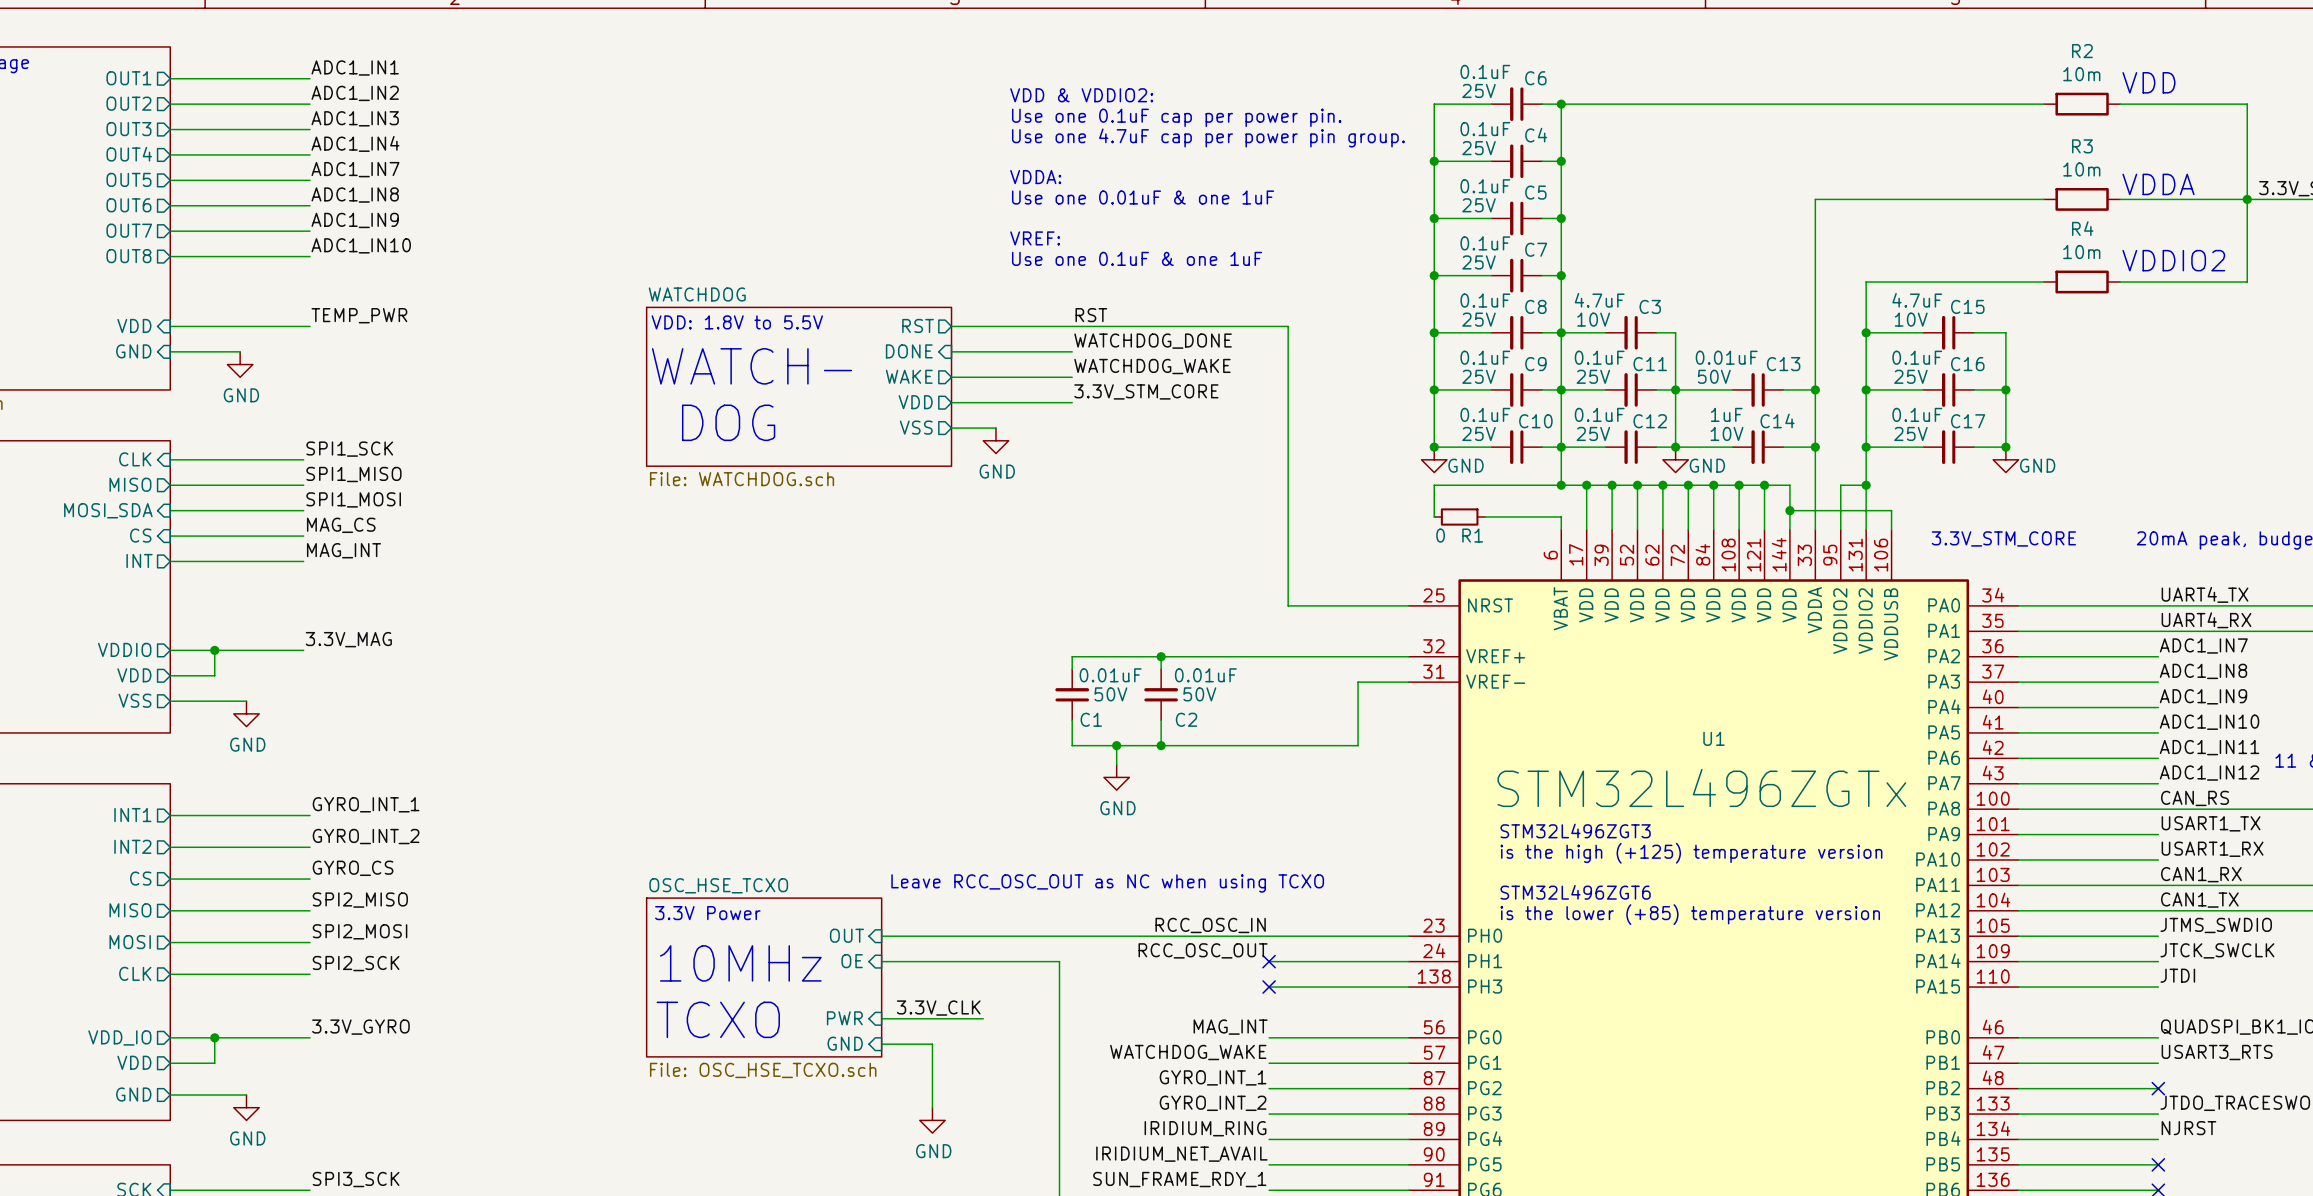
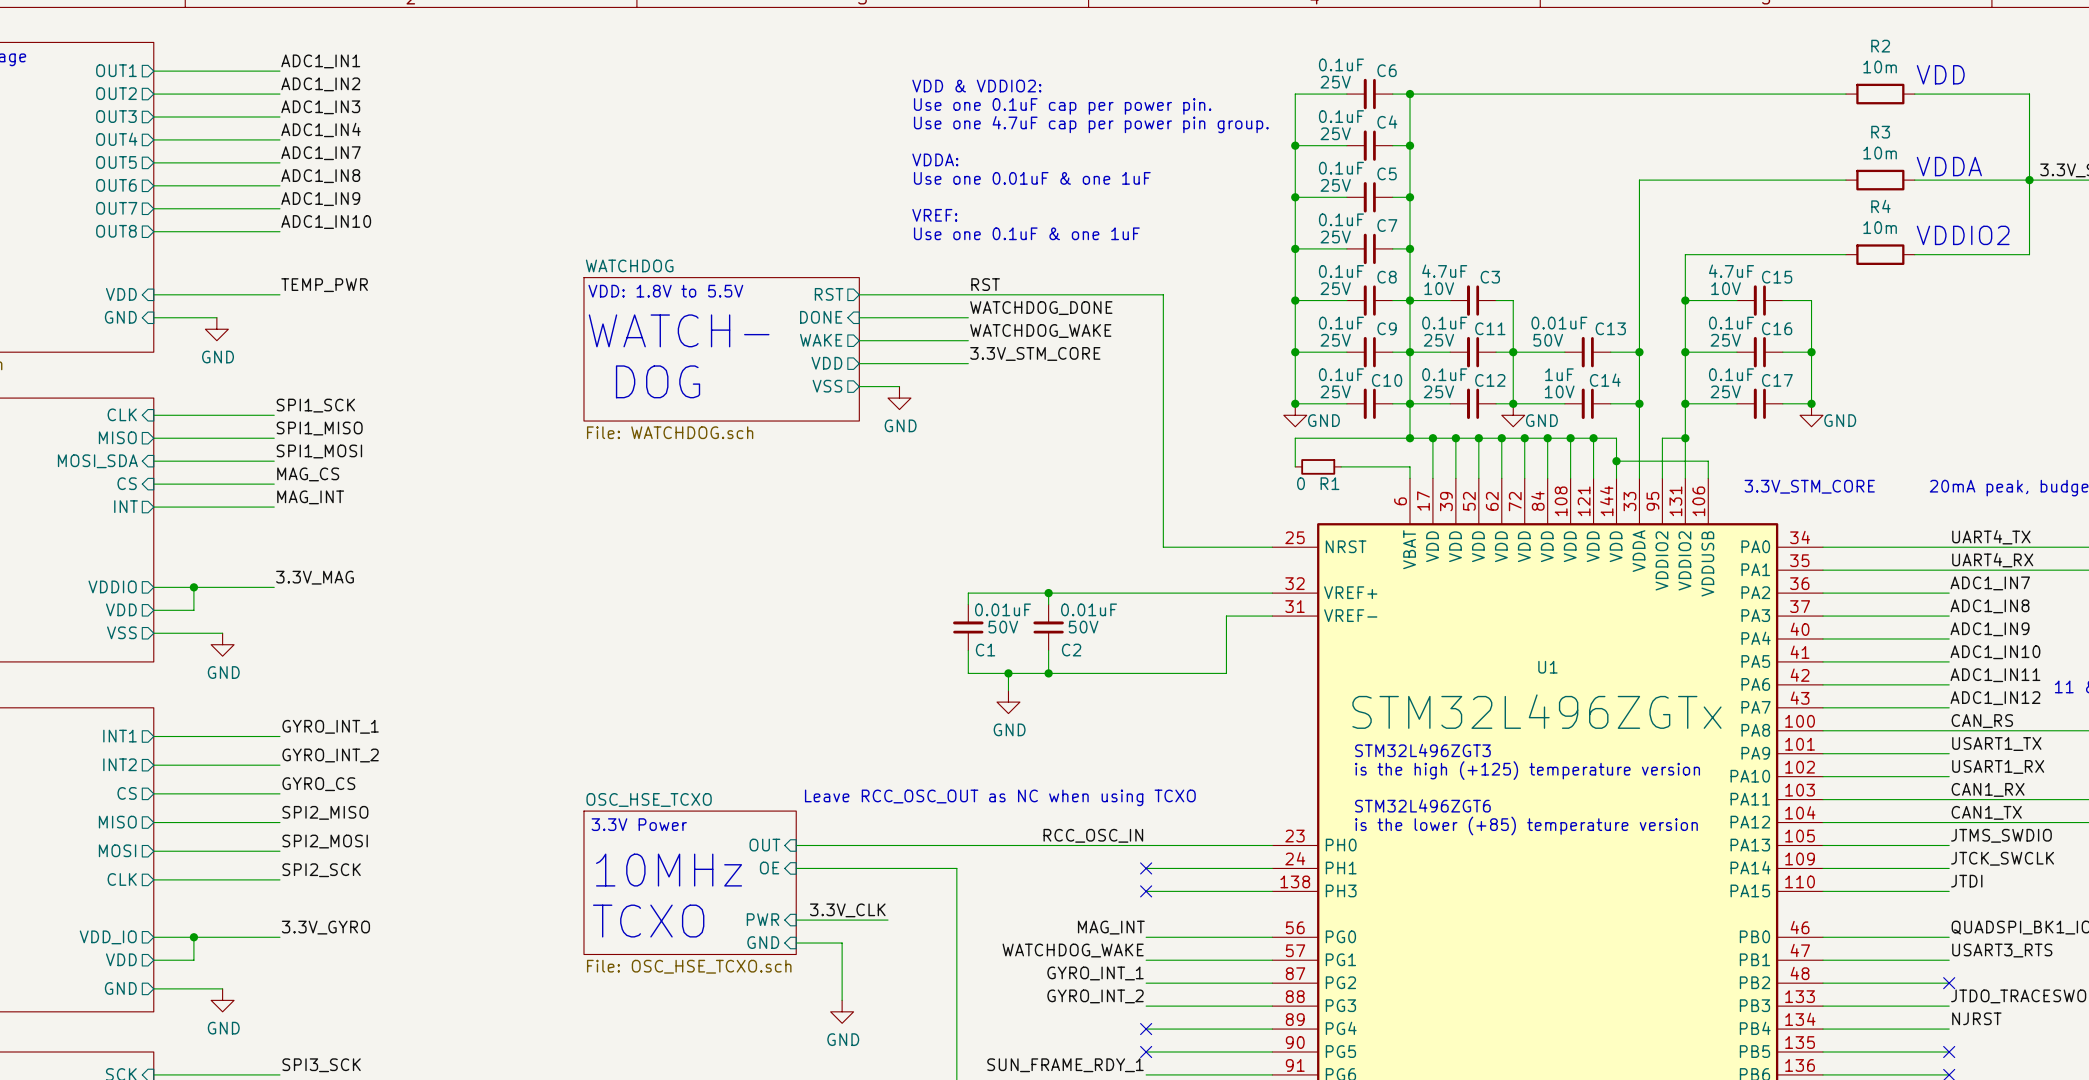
label: RCC_OSC_OUT (1203, 950) -> none
label: IRIDIUM_RING (1205, 1128) -> none
no-connect mark: none -> (1146, 1029)
label: IRIDIUM_NET_AVAIL (1181, 1154) -> none
no-connect mark: none -> (1146, 1051)

